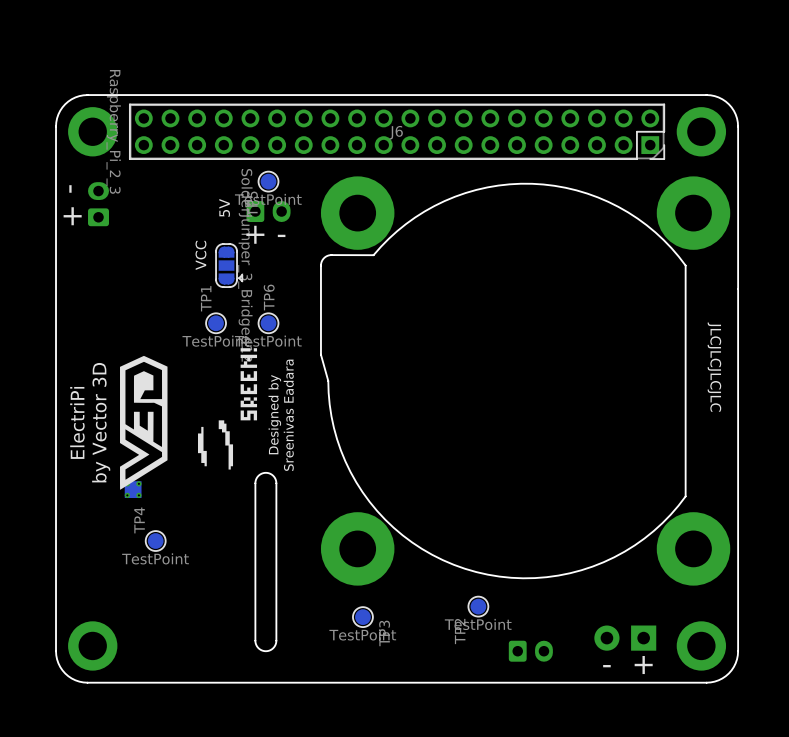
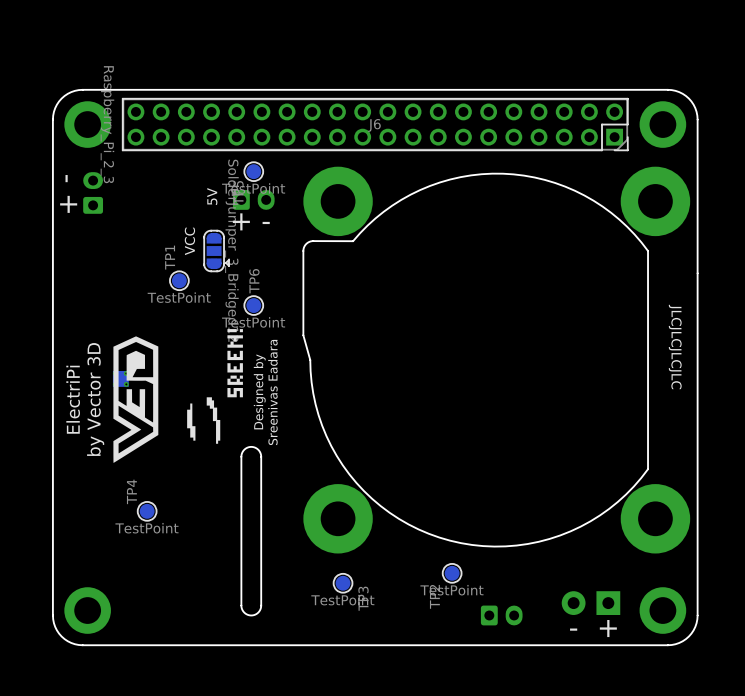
TP1 position: (216, 323) -> (179, 280)
part position: (133, 489) -> (120, 378)

